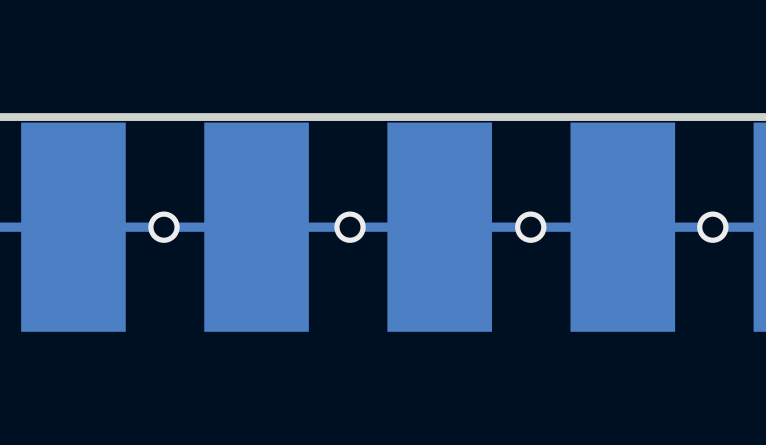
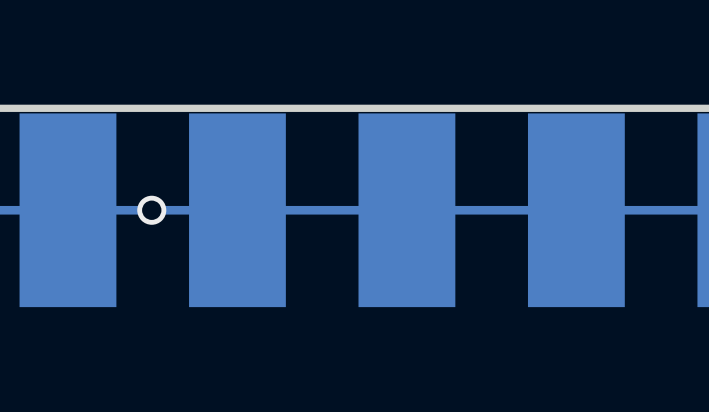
via: (350, 227) -> none
via: (530, 227) -> none
via: (712, 227) -> none

